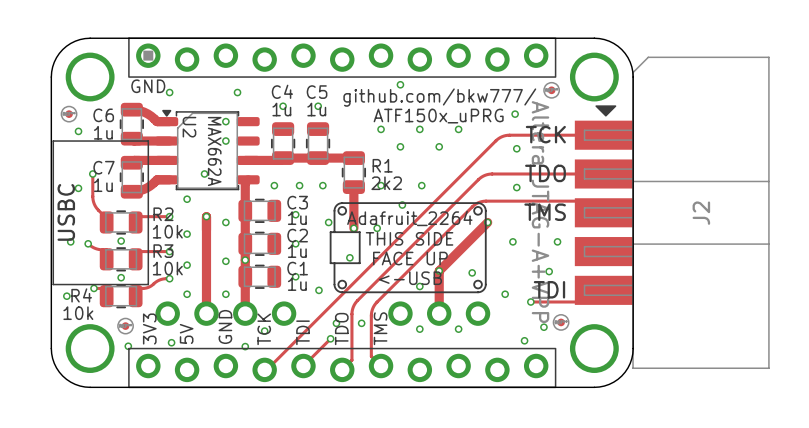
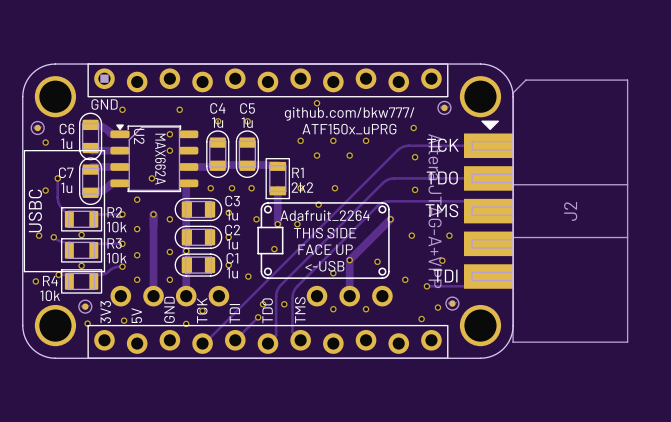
C6 footprint: [119, 102, 144, 146] -> [79, 112, 103, 161]
C4 footprint: [270, 122, 296, 165] -> [206, 130, 230, 178]
C5 footprint: [305, 122, 331, 165] -> [235, 130, 259, 178]
R1 footprint: [341, 151, 367, 194] -> [265, 158, 291, 200]
C7 footprint: [119, 155, 144, 199] -> [79, 157, 103, 205]
C3 footprint: [238, 198, 282, 223] -> [174, 197, 223, 222]
R2 footprint: [99, 210, 143, 235] -> [61, 207, 103, 232]
C2 footprint: [238, 231, 282, 256] -> [174, 225, 223, 249]
R3 footprint: [99, 247, 143, 272] -> [61, 238, 103, 263]
C1 footprint: [238, 264, 282, 289] -> [174, 253, 223, 277]
R4 footprint: [99, 284, 143, 309] -> [61, 269, 103, 294]

